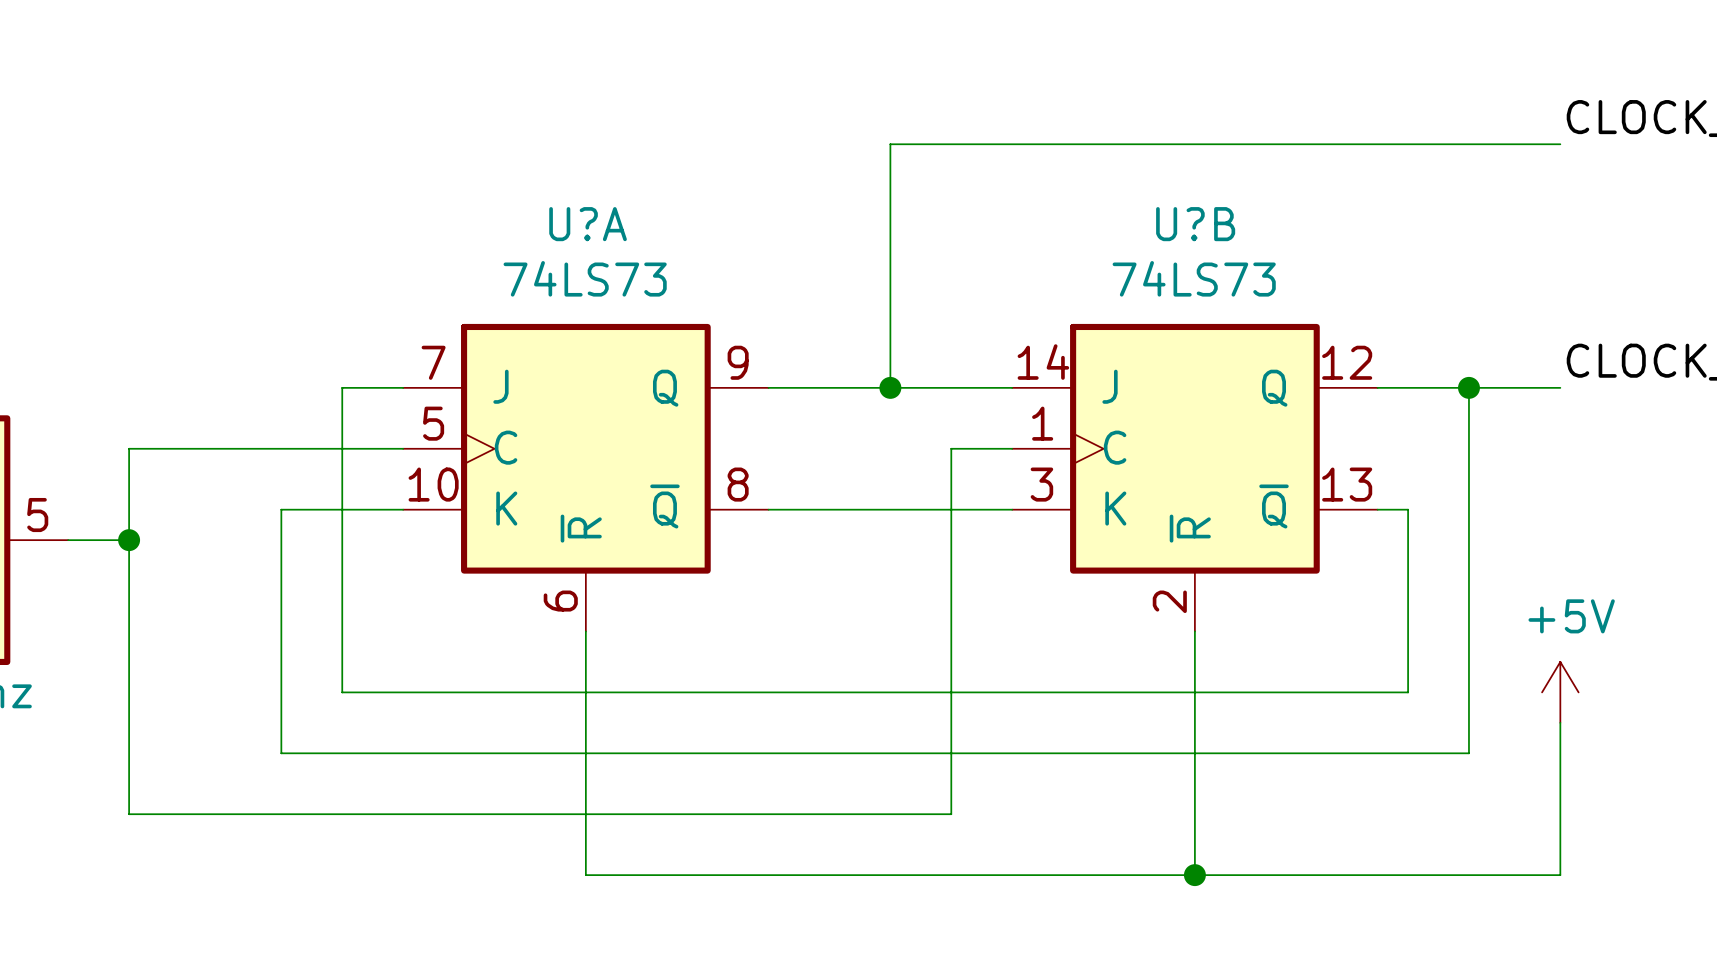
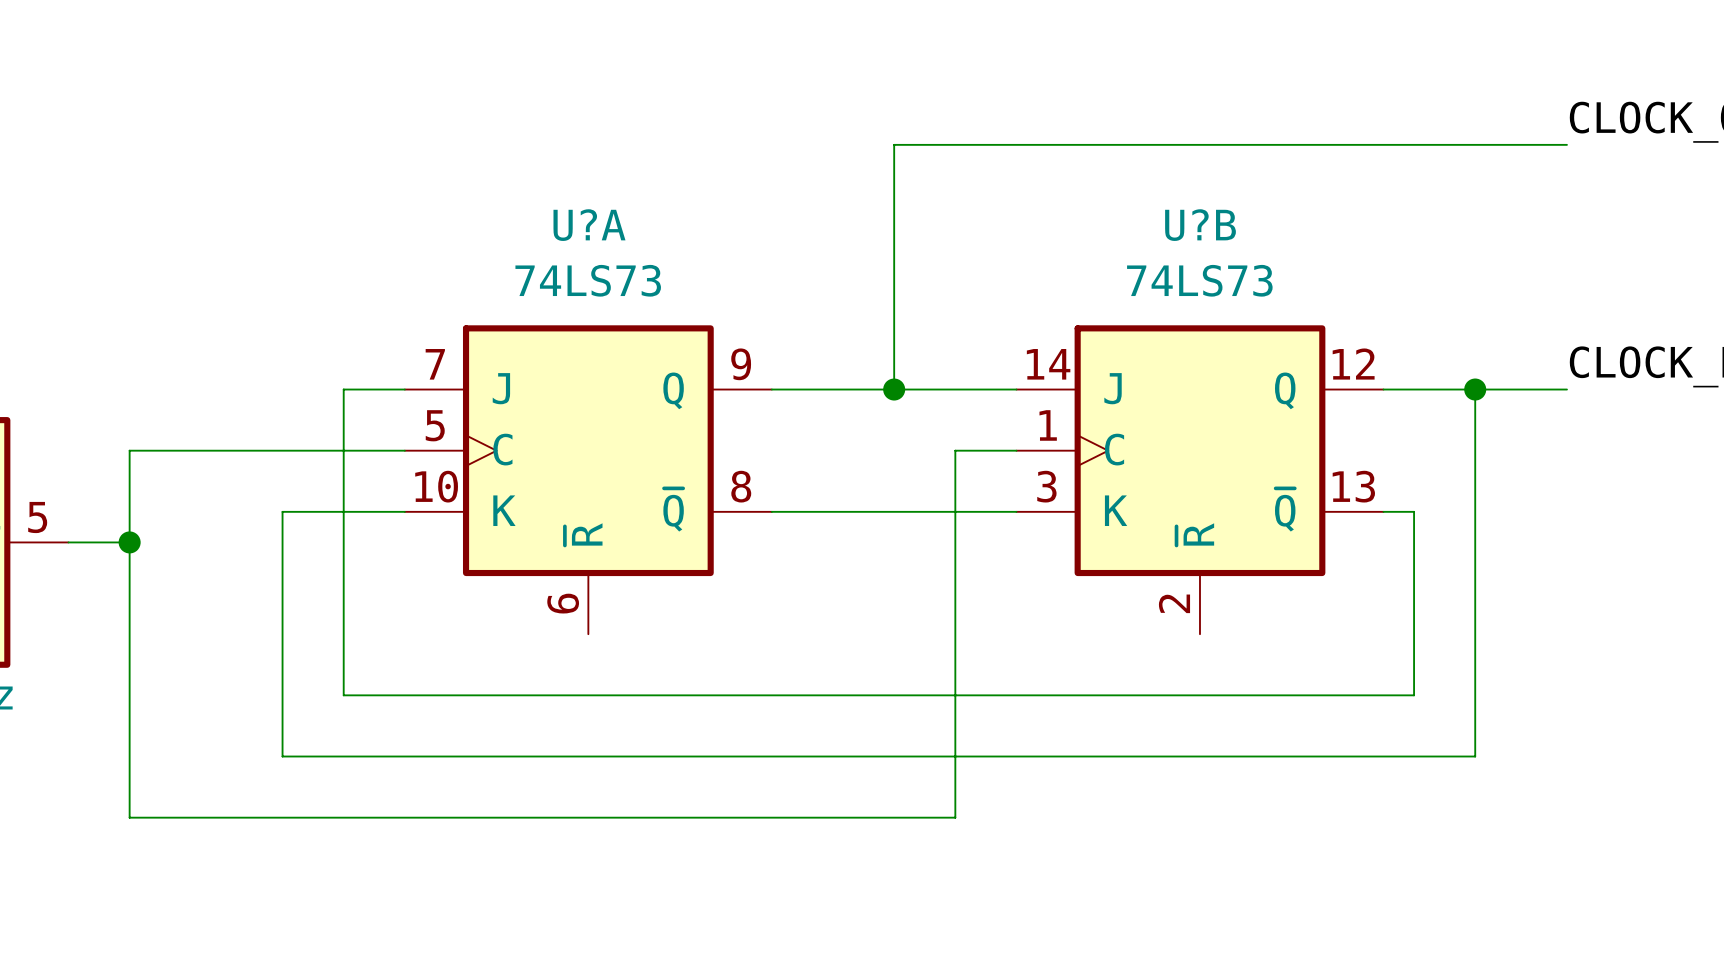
wire: (585, 631) (585, 875) (1560, 875) (1560, 722) -> none
wire: (1194, 631) (1194, 875) -> none
power symbol: +5V (1560, 692) -> none
junction: (1194, 875) -> none

